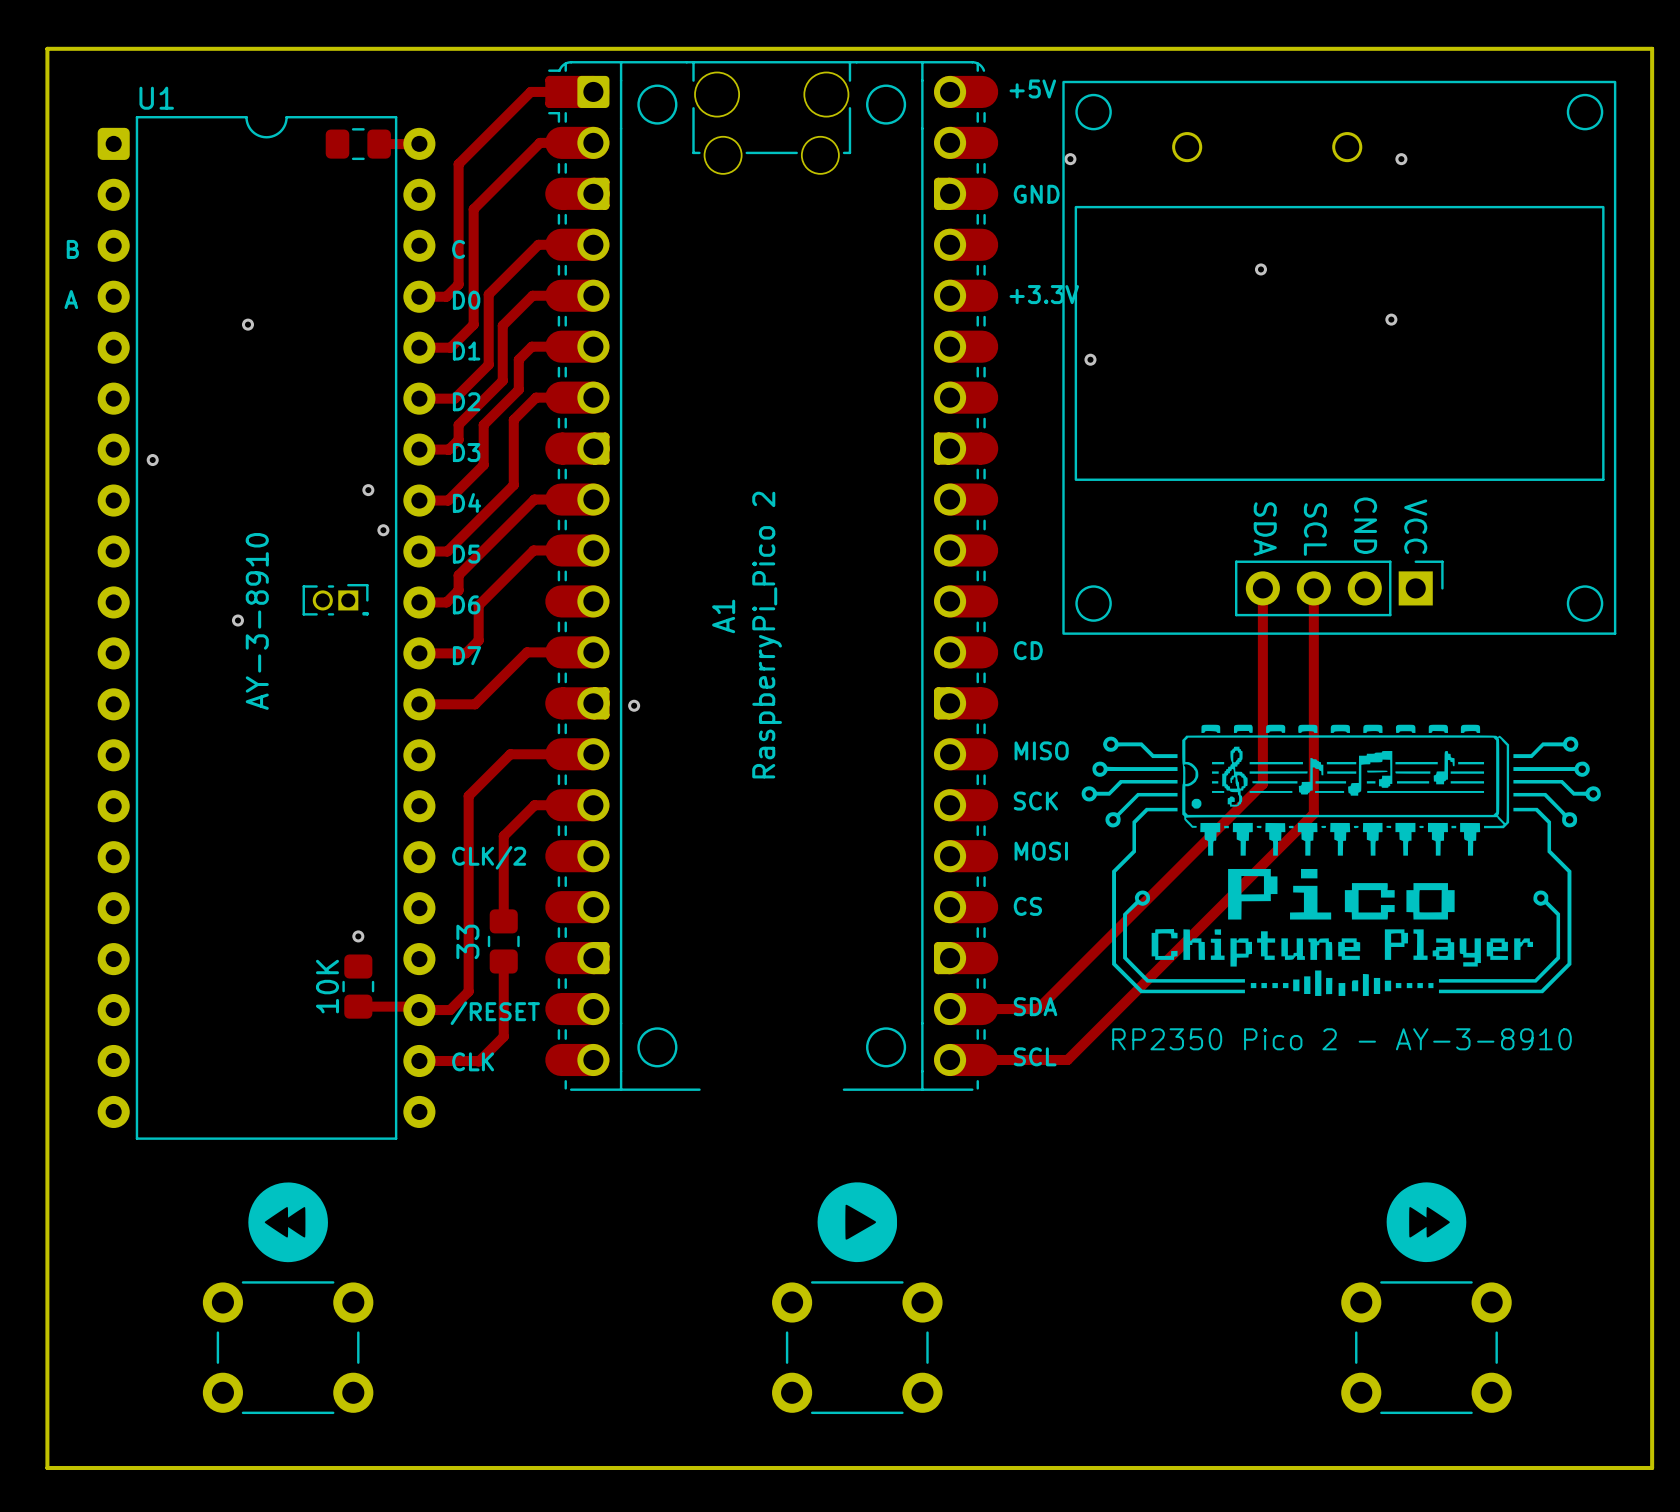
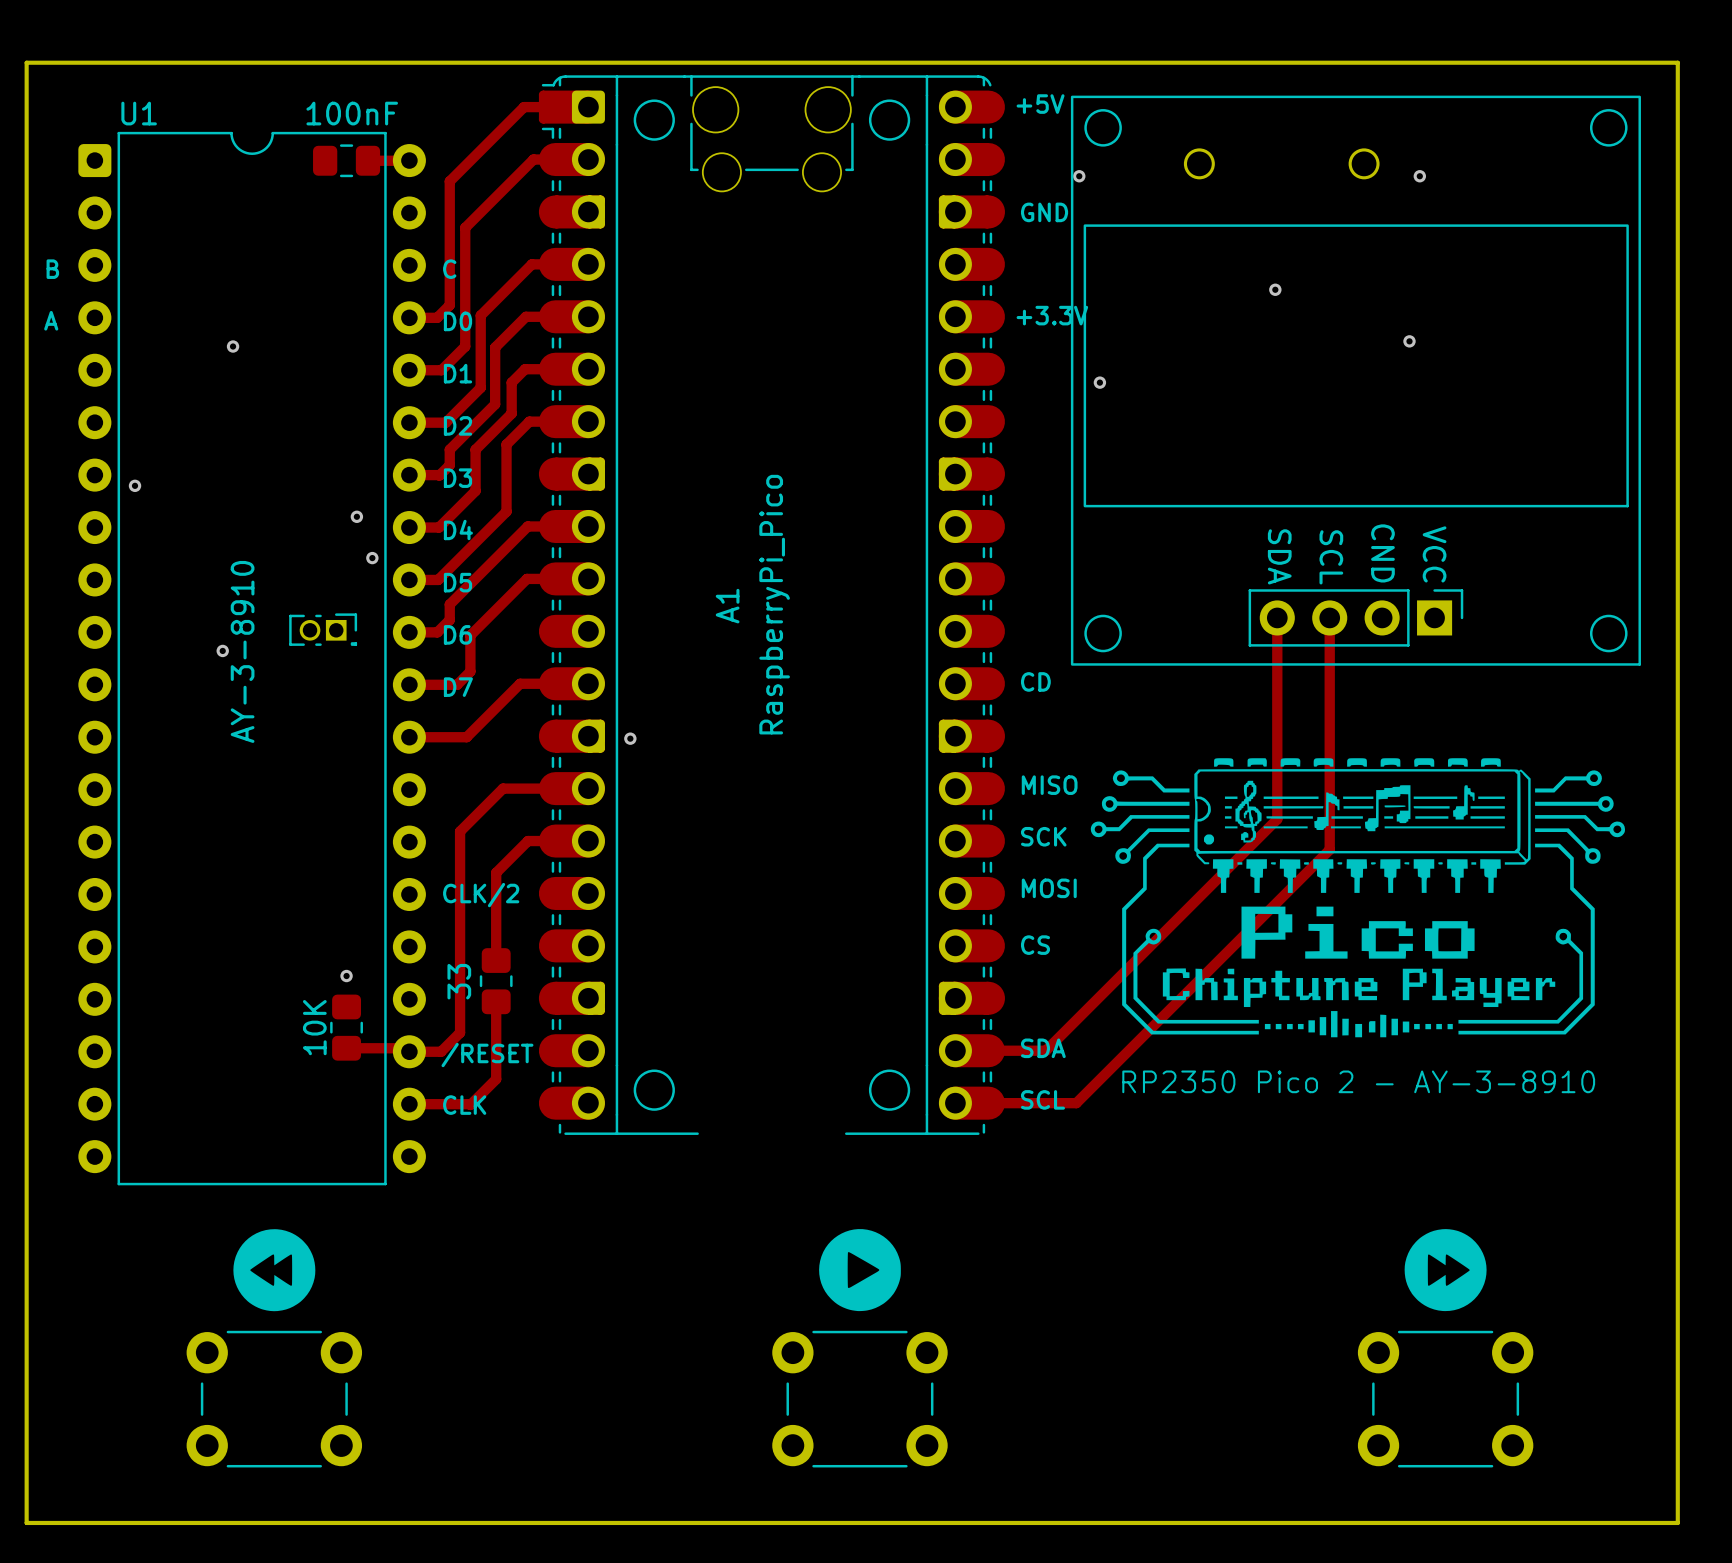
part value: none -> 100nF (352, 113)
A1 name position: A1 (723, 616) -> A1 (727, 606)
A1 value: RaspberryPi_Pico 2 (767, 635) -> RaspberryPi_Pico (774, 604)

